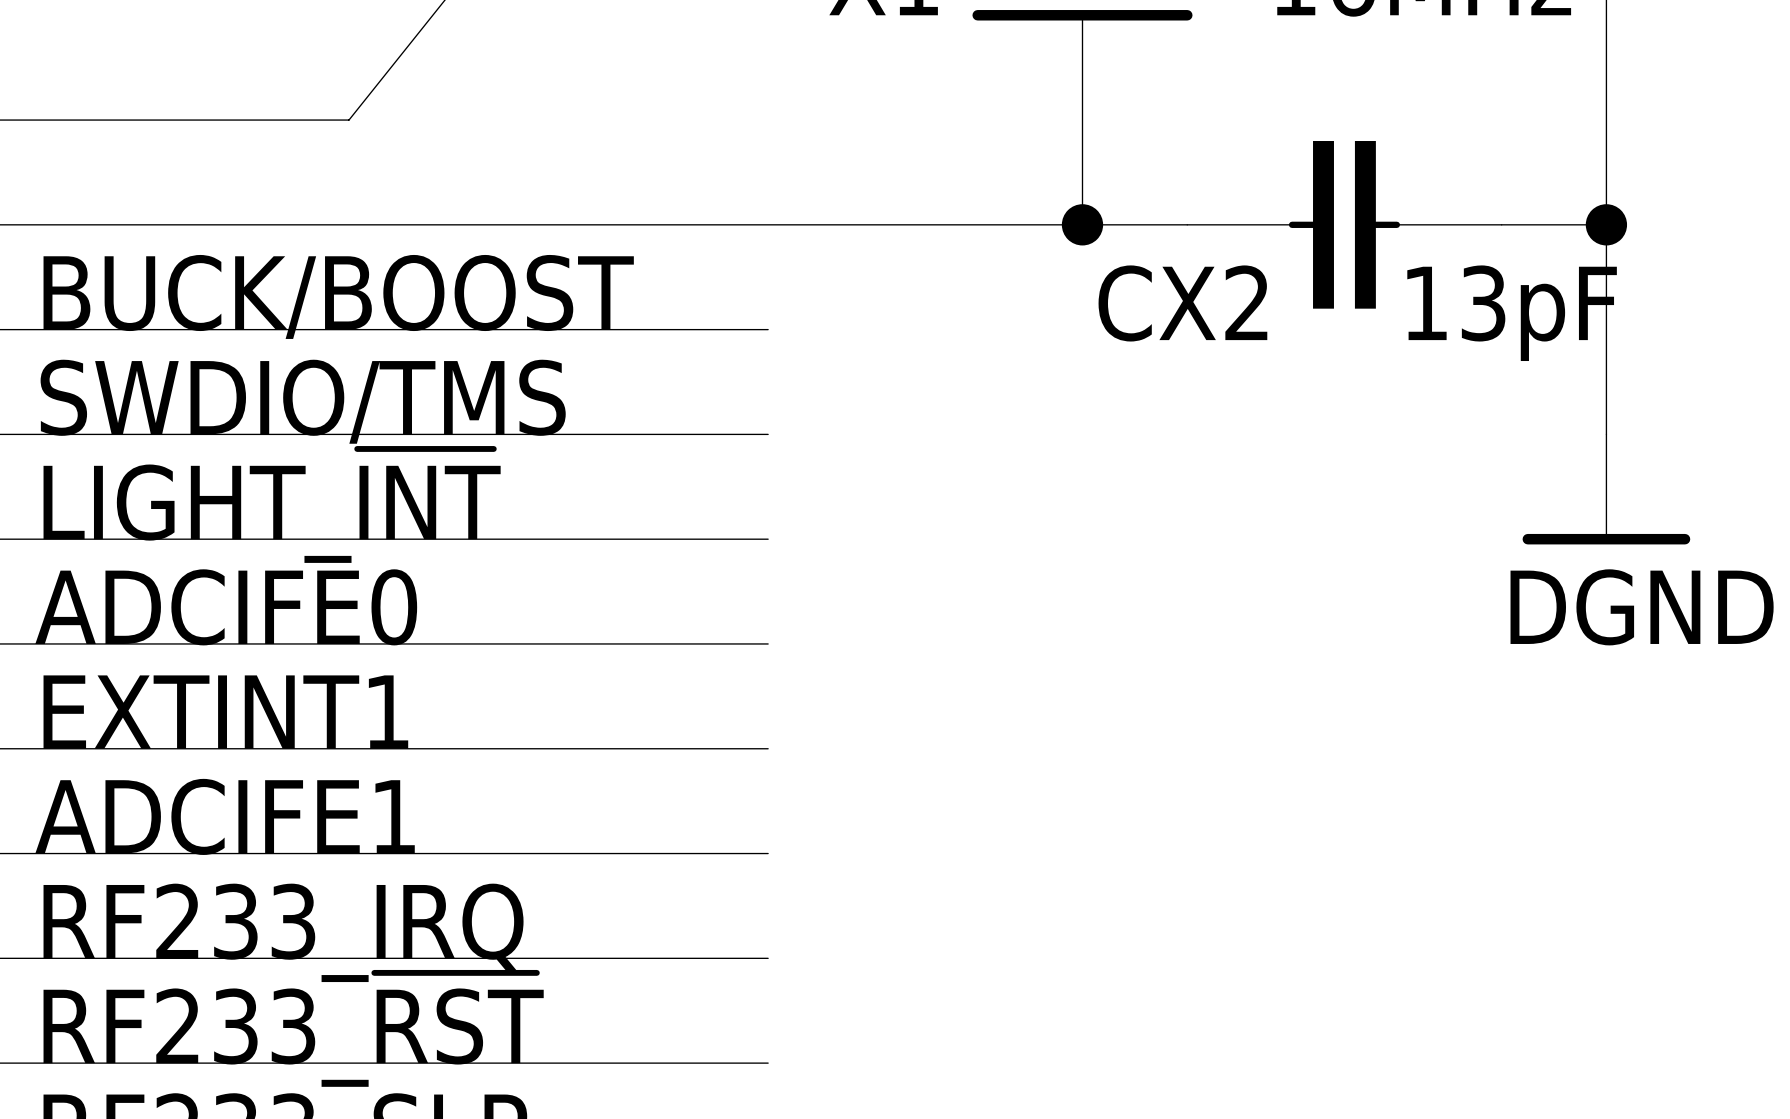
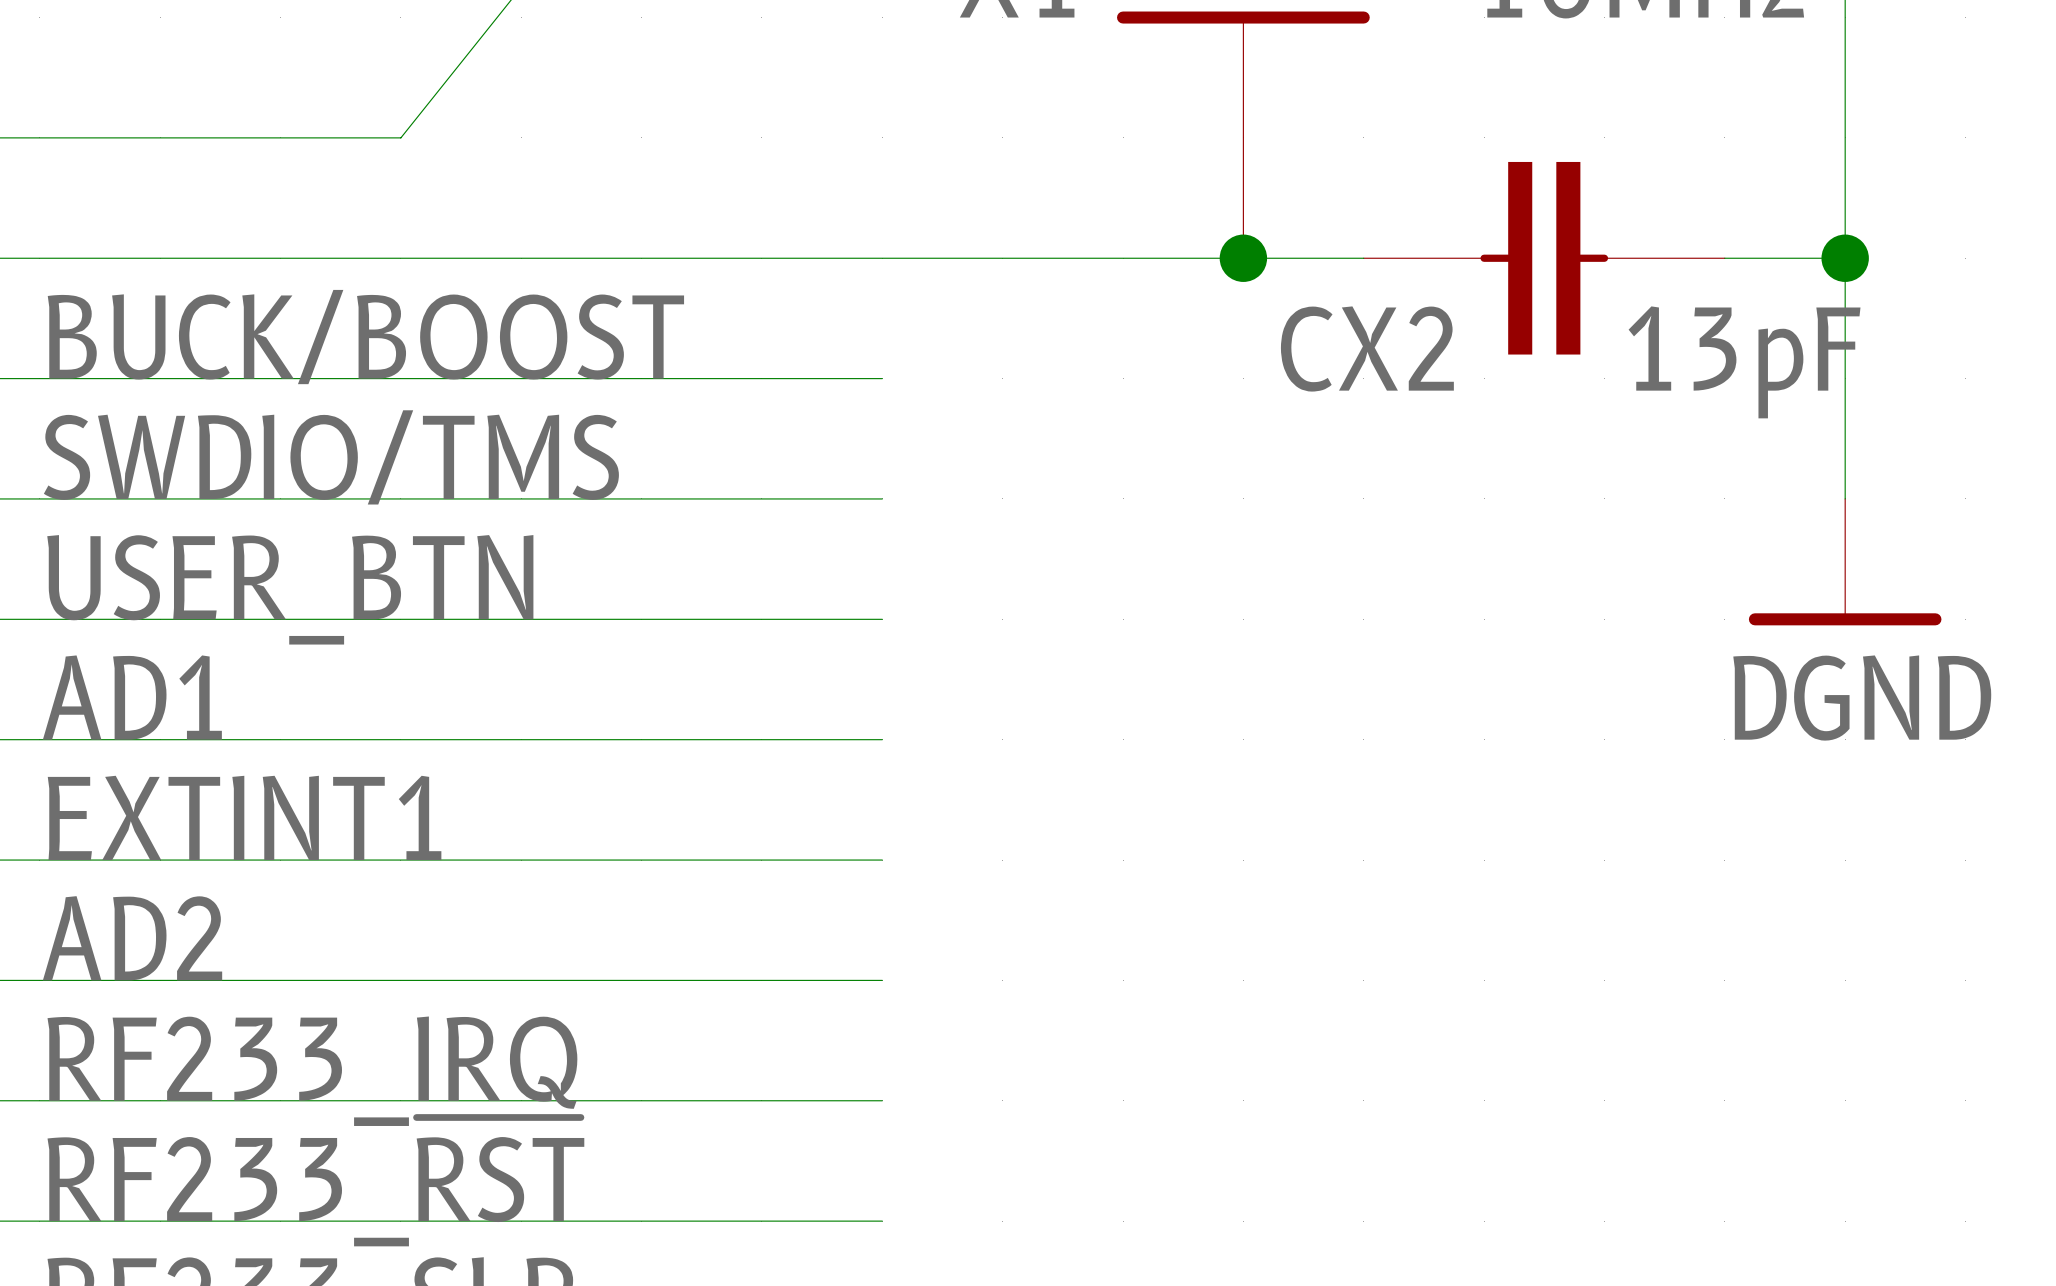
label: LIGHT_~{INT} (272, 505) -> USER_BTN (290, 589)
label: ADCIFE0 (226, 607) -> AD1 (132, 697)
label: ADCIFE1 (225, 816) -> AD2 (132, 938)

